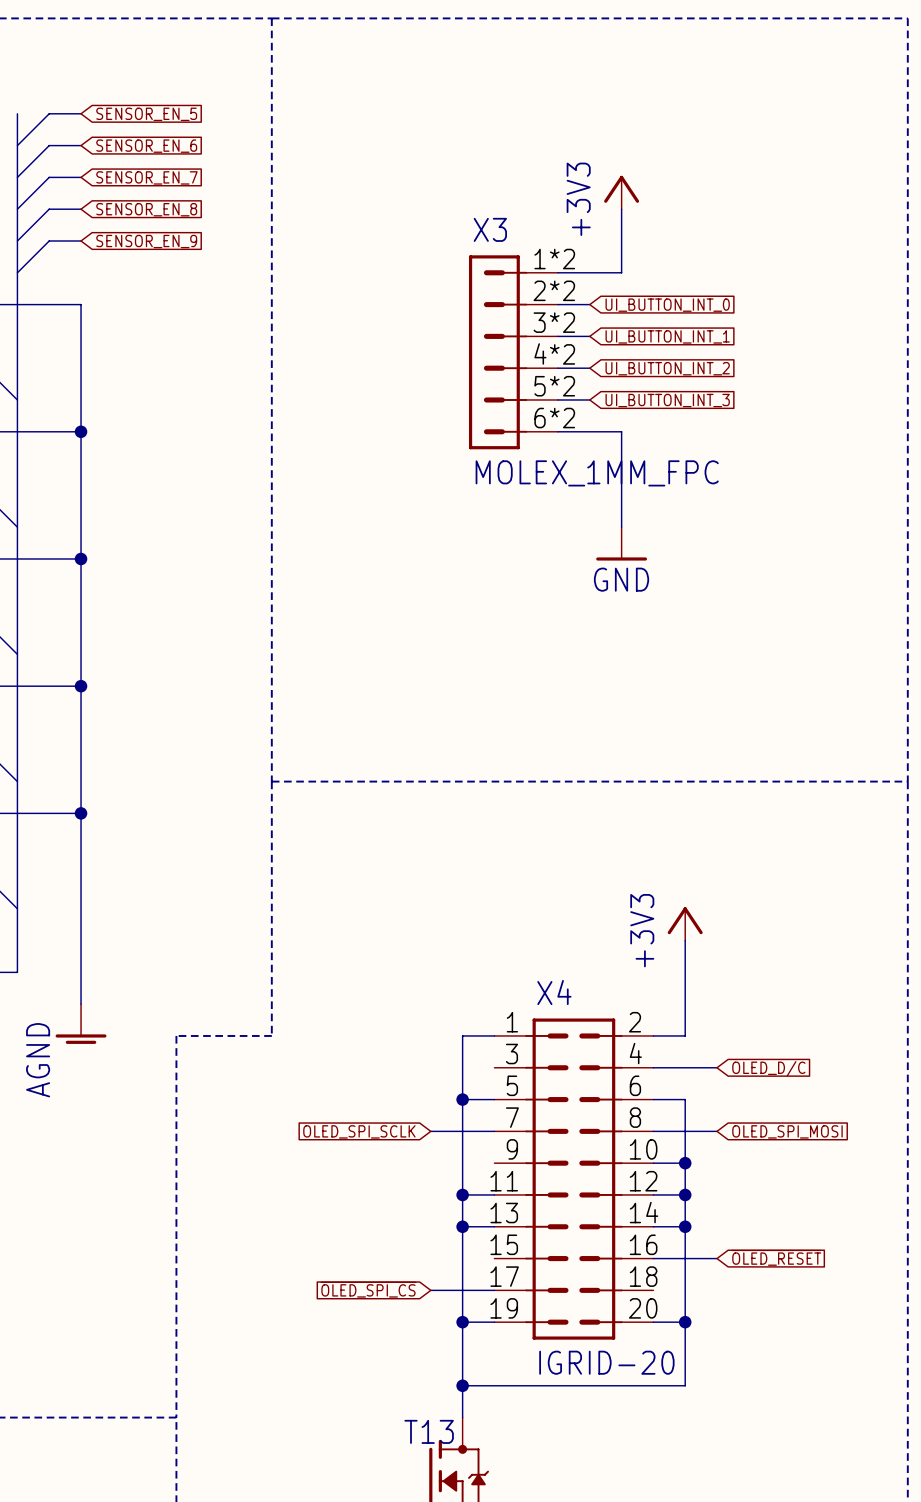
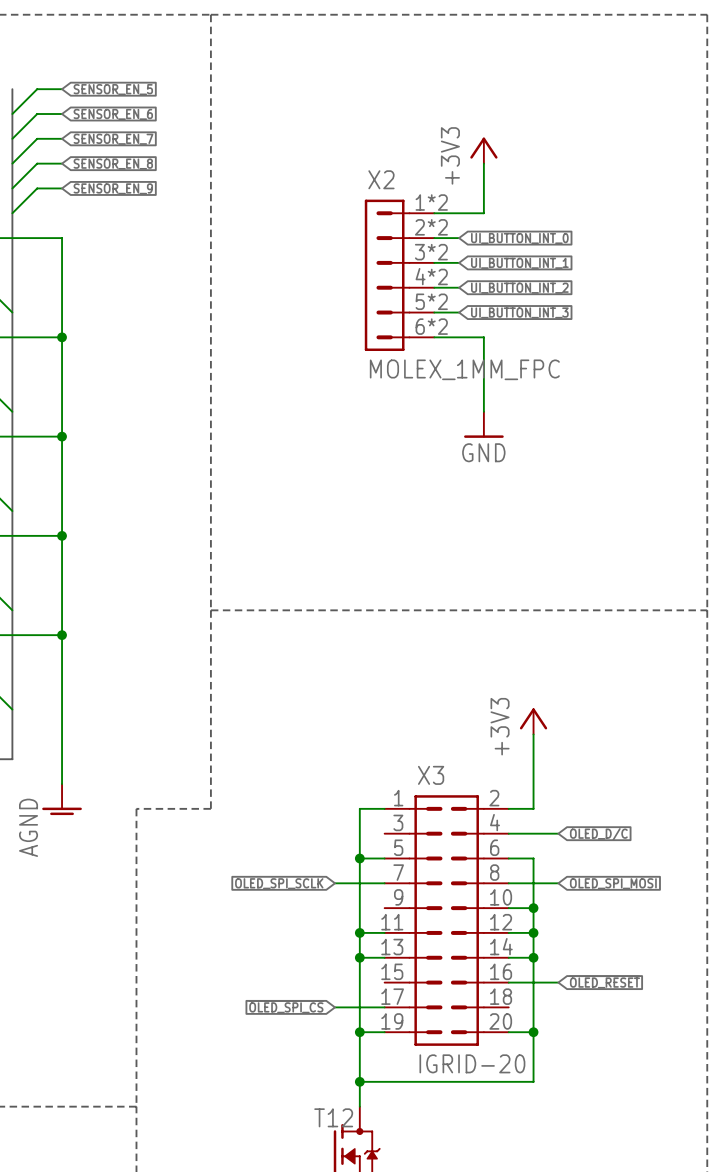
X3 name: X3 (490, 229) -> X2 (381, 179)
X4 name: X4 (554, 992) -> X3 (431, 775)
T13 name: T13 (429, 1431) -> T12 (333, 1117)

